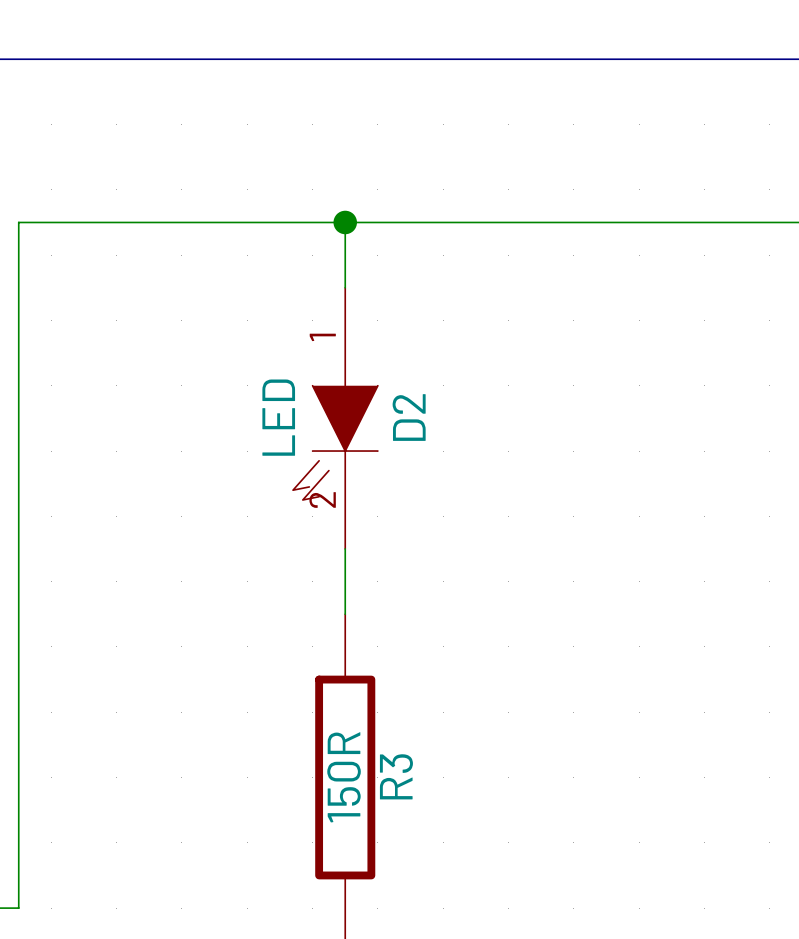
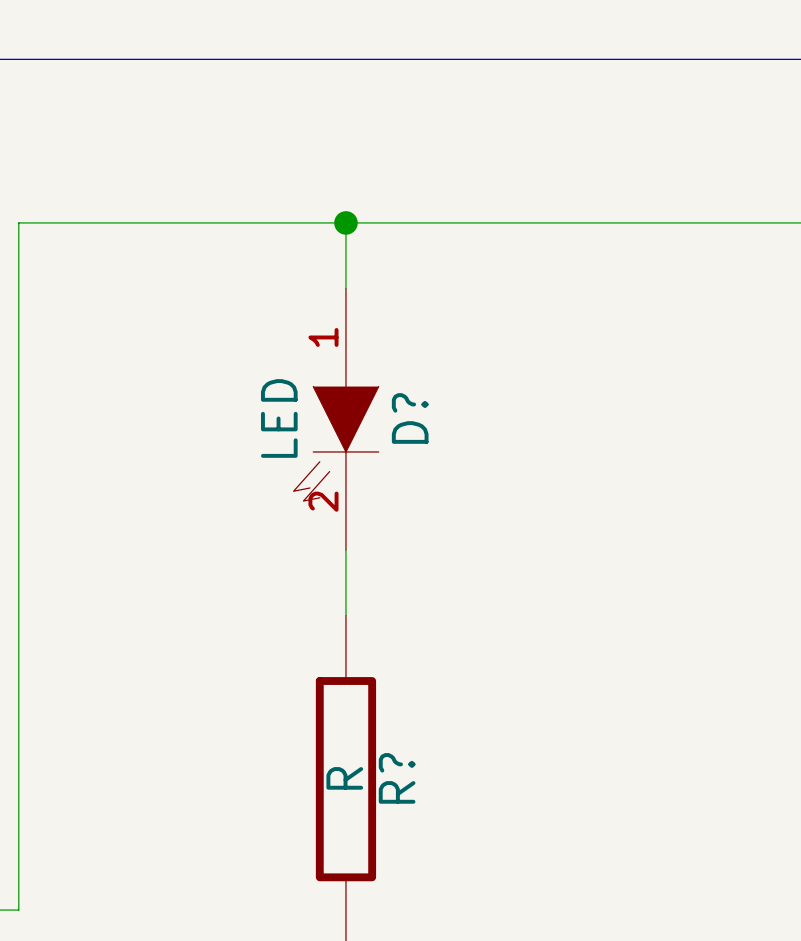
D2 name: D2 (409, 417) -> D? (410, 418)
R3 name: R3 (396, 776) -> R? (397, 778)
R3 value: 150R (344, 777) -> R (344, 778)

